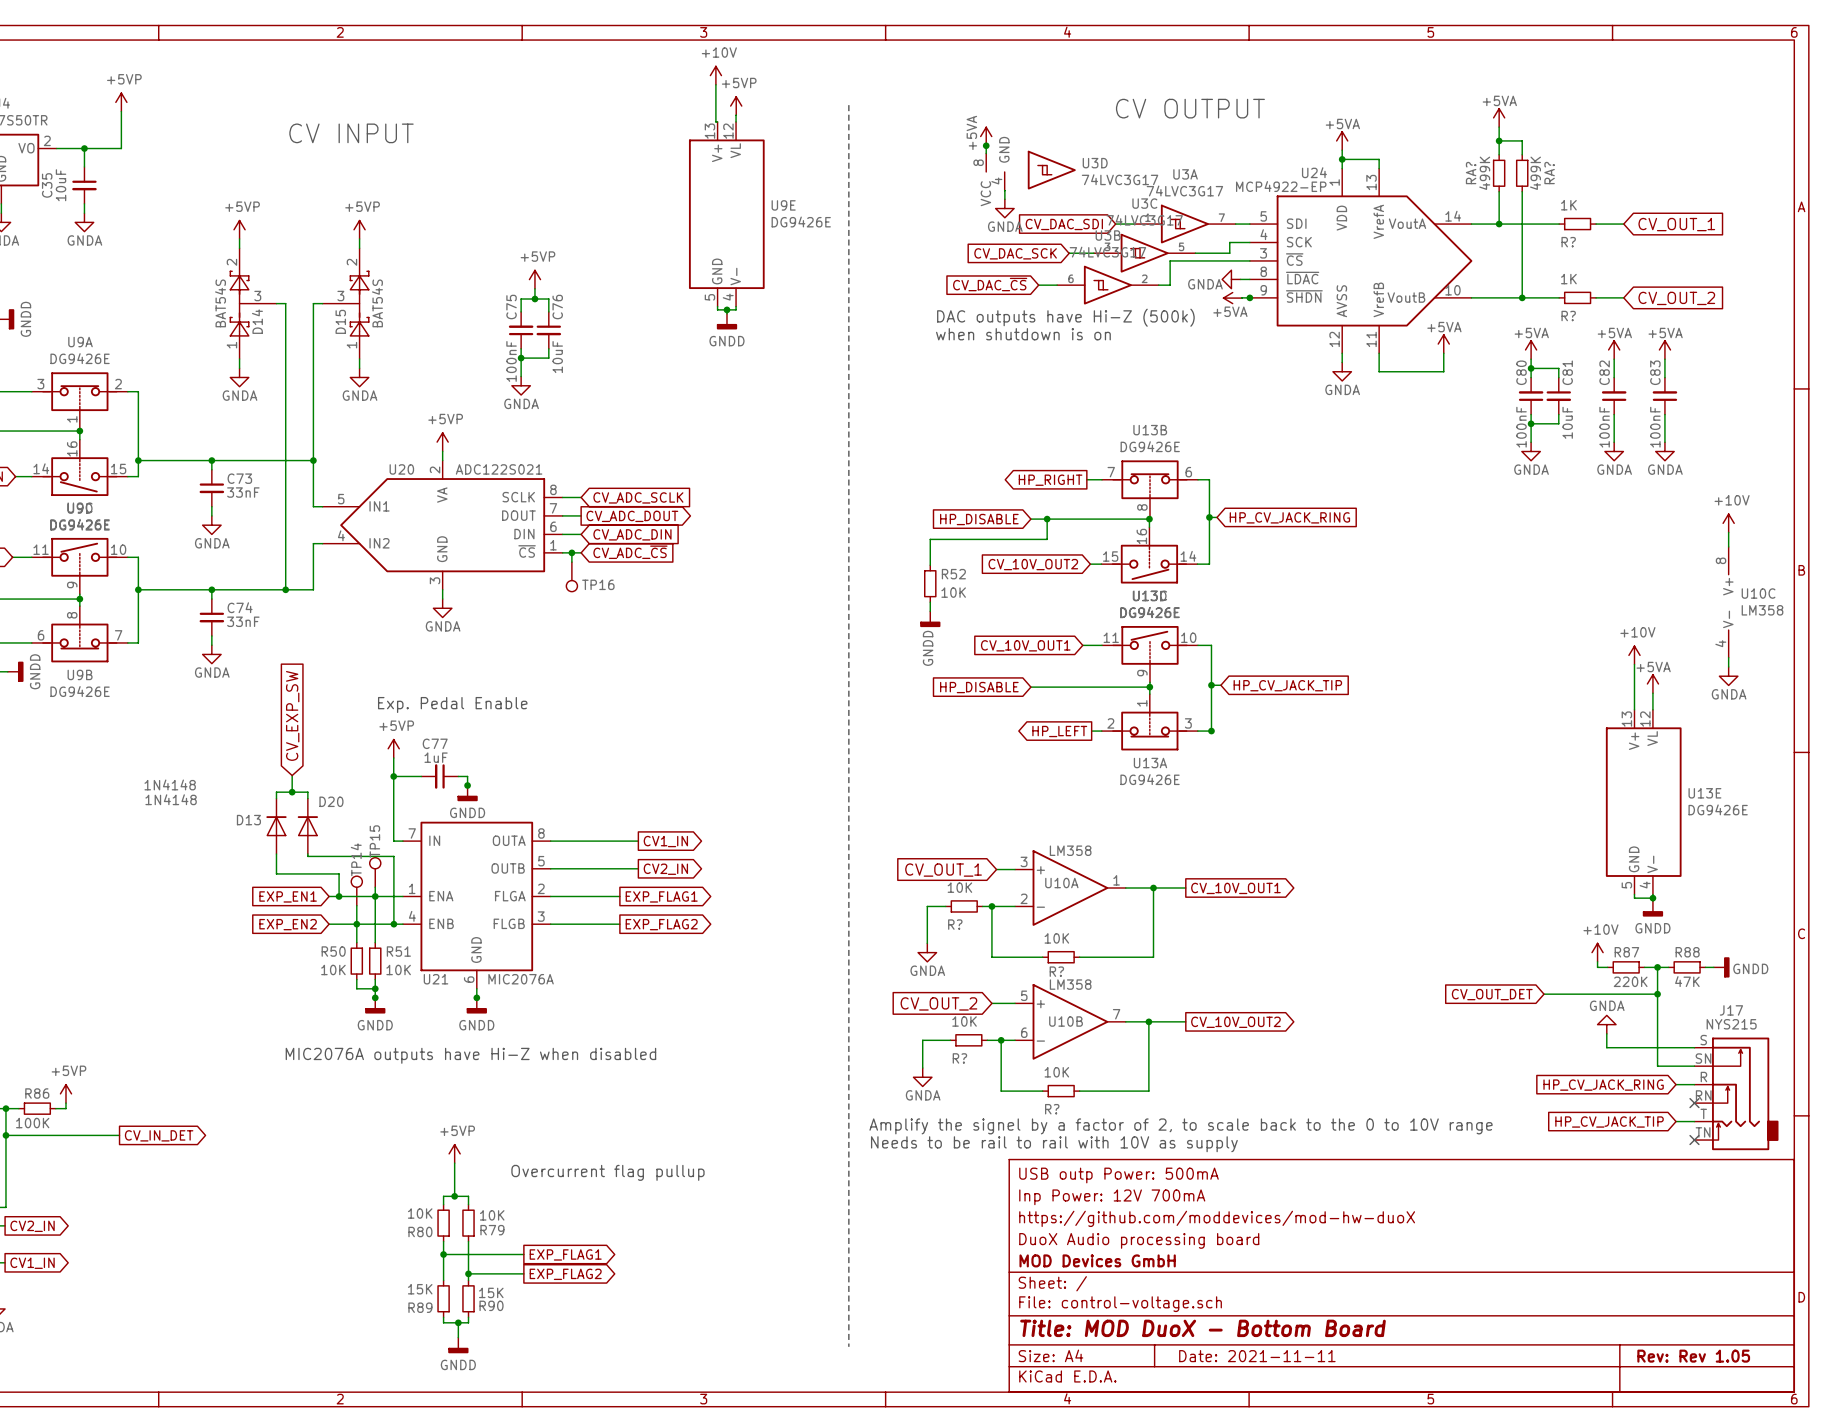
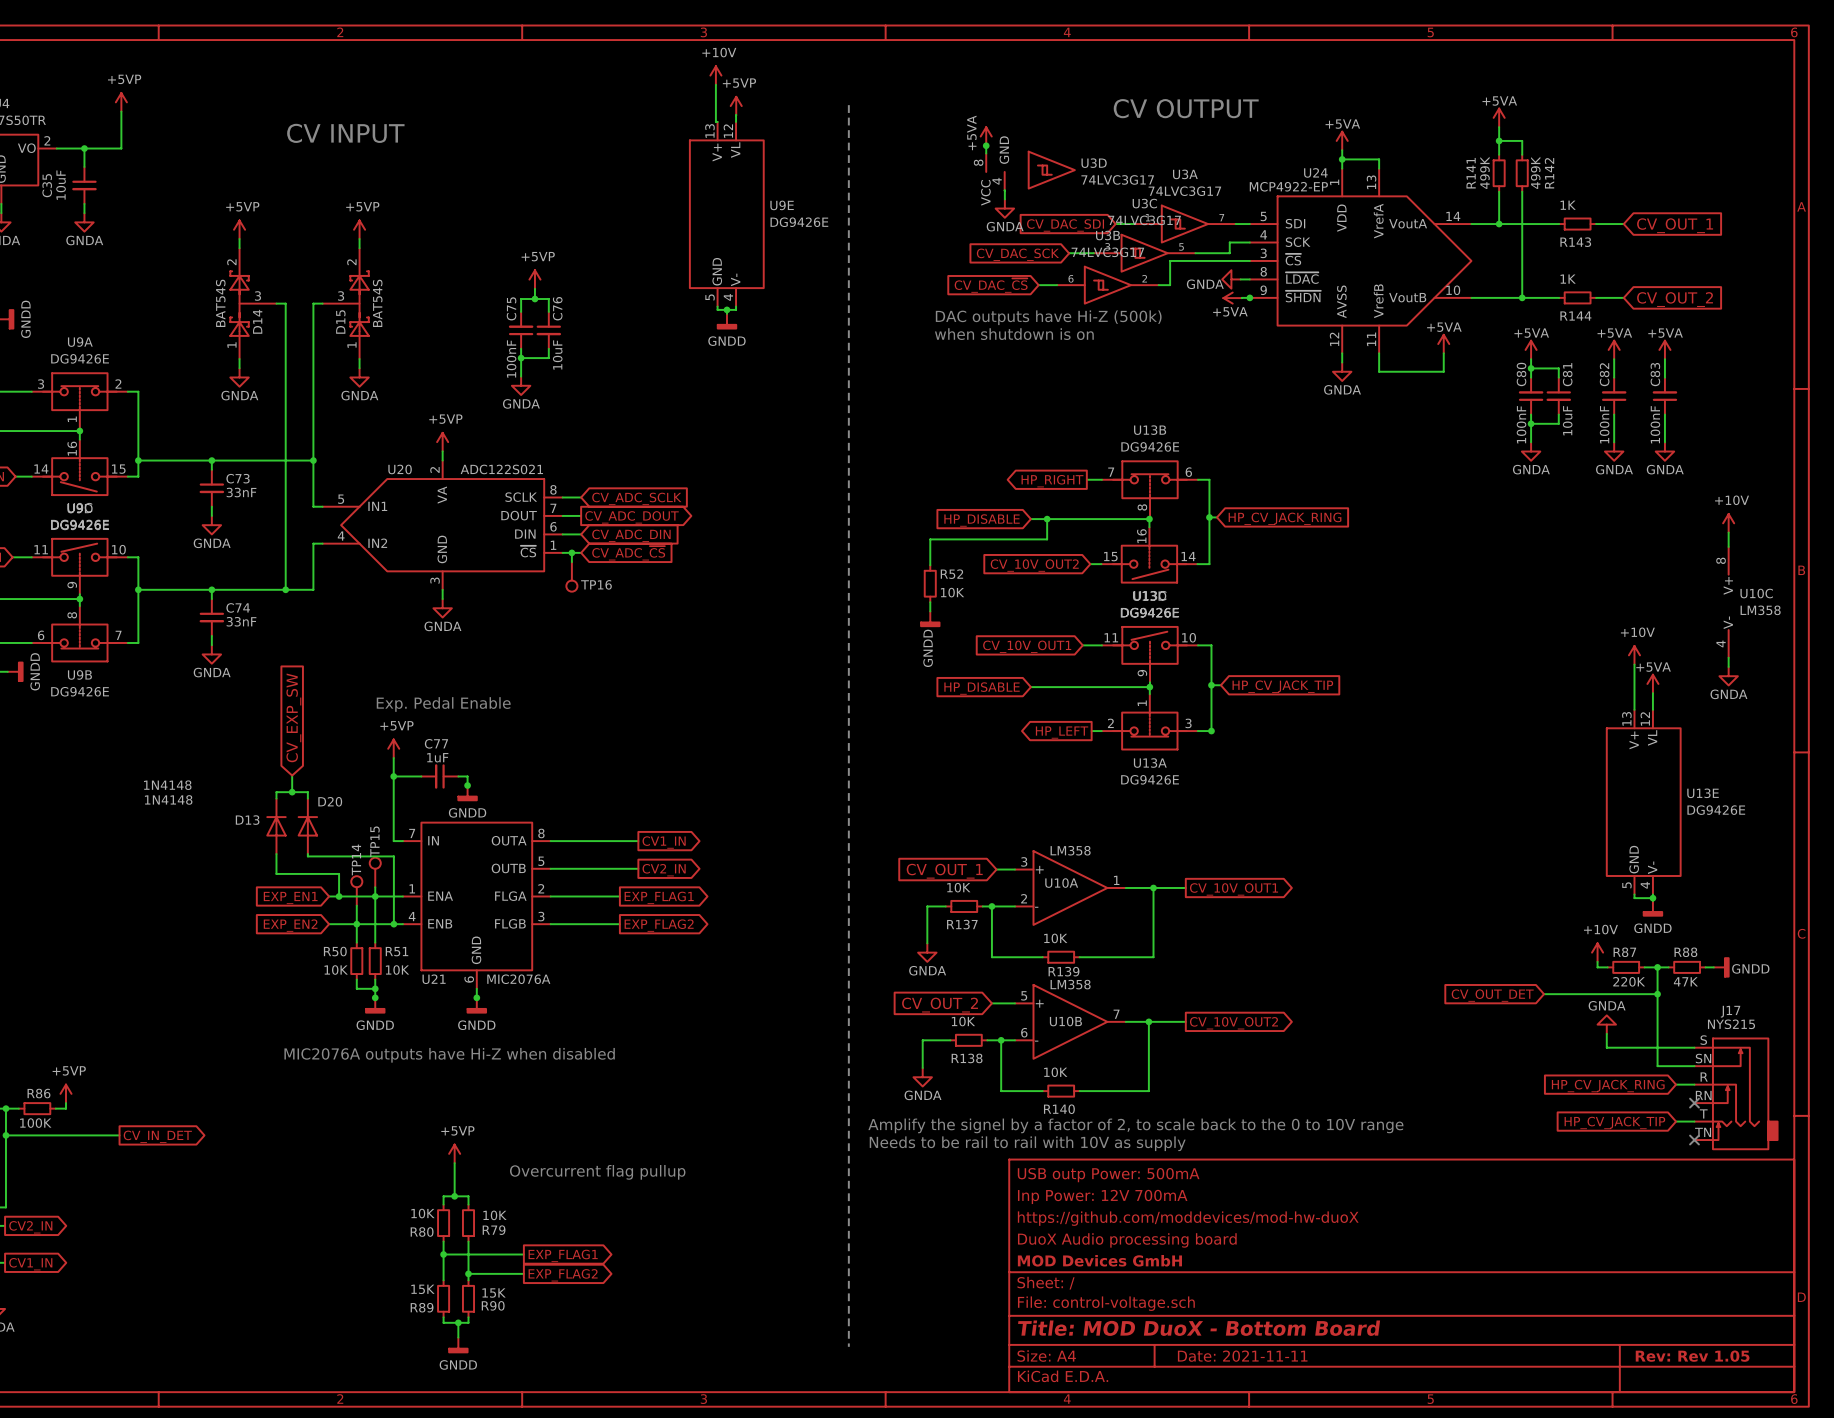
RA? name: RA? (1471, 173) -> R141 (1471, 173)
RA? name: RA? (1549, 173) -> R142 (1549, 173)
R? name: R? (1568, 242) -> R143 (1575, 242)
R? name: R? (1568, 316) -> R144 (1575, 316)
R? name: R? (955, 924) -> R137 (962, 924)
R? name: R? (1056, 971) -> R139 (1064, 971)
R? name: R? (959, 1058) -> R138 (967, 1058)
R? name: R? (1052, 1109) -> R140 (1059, 1109)

